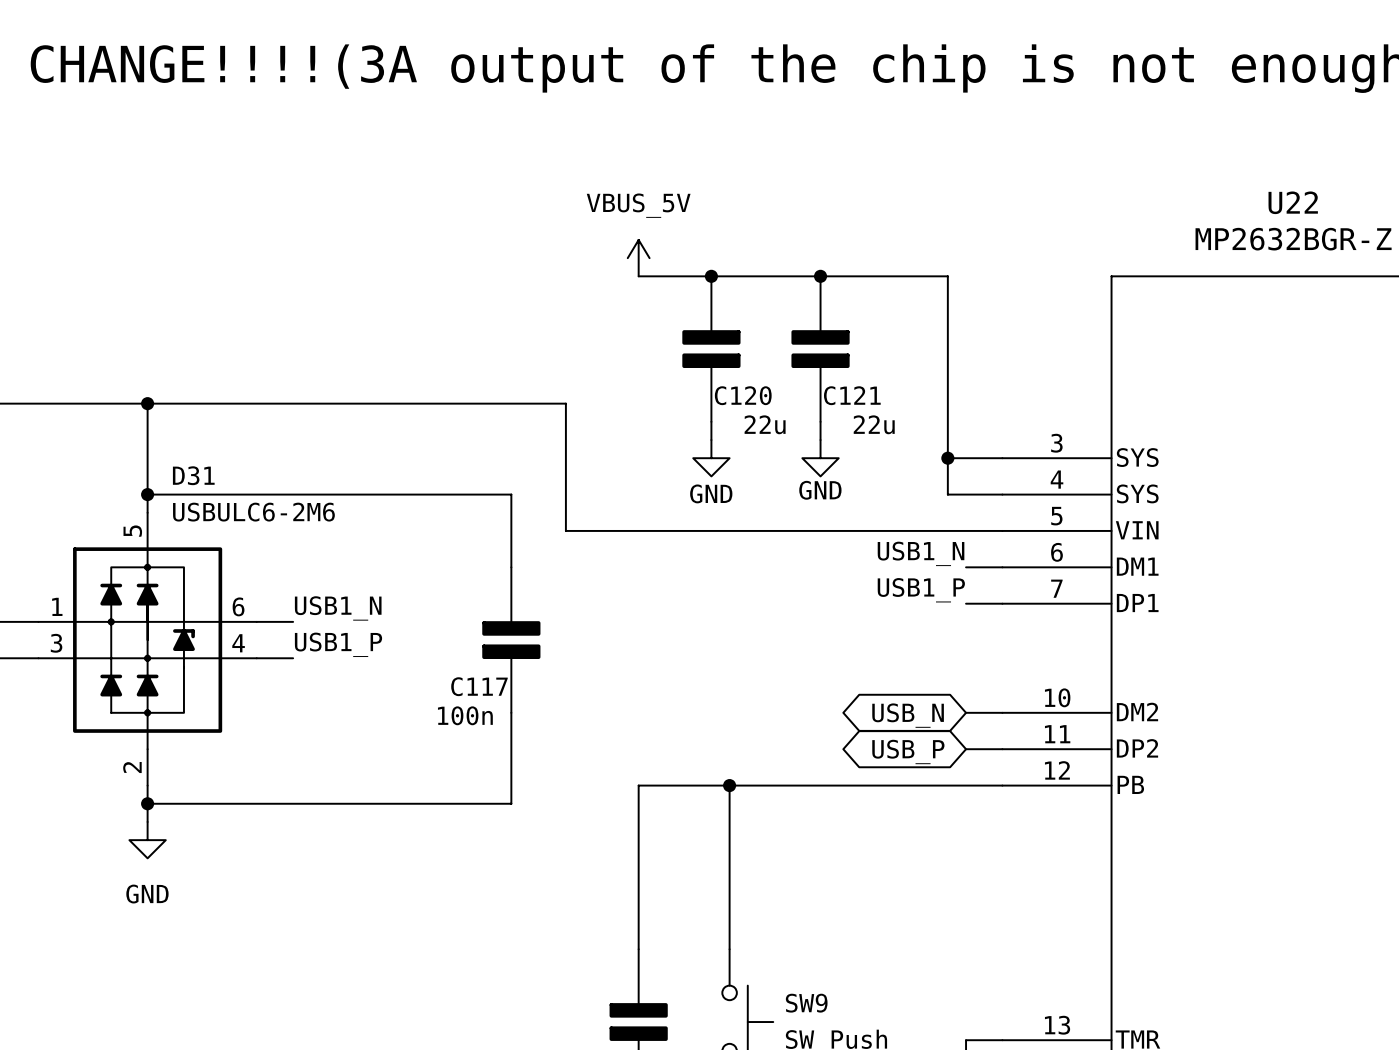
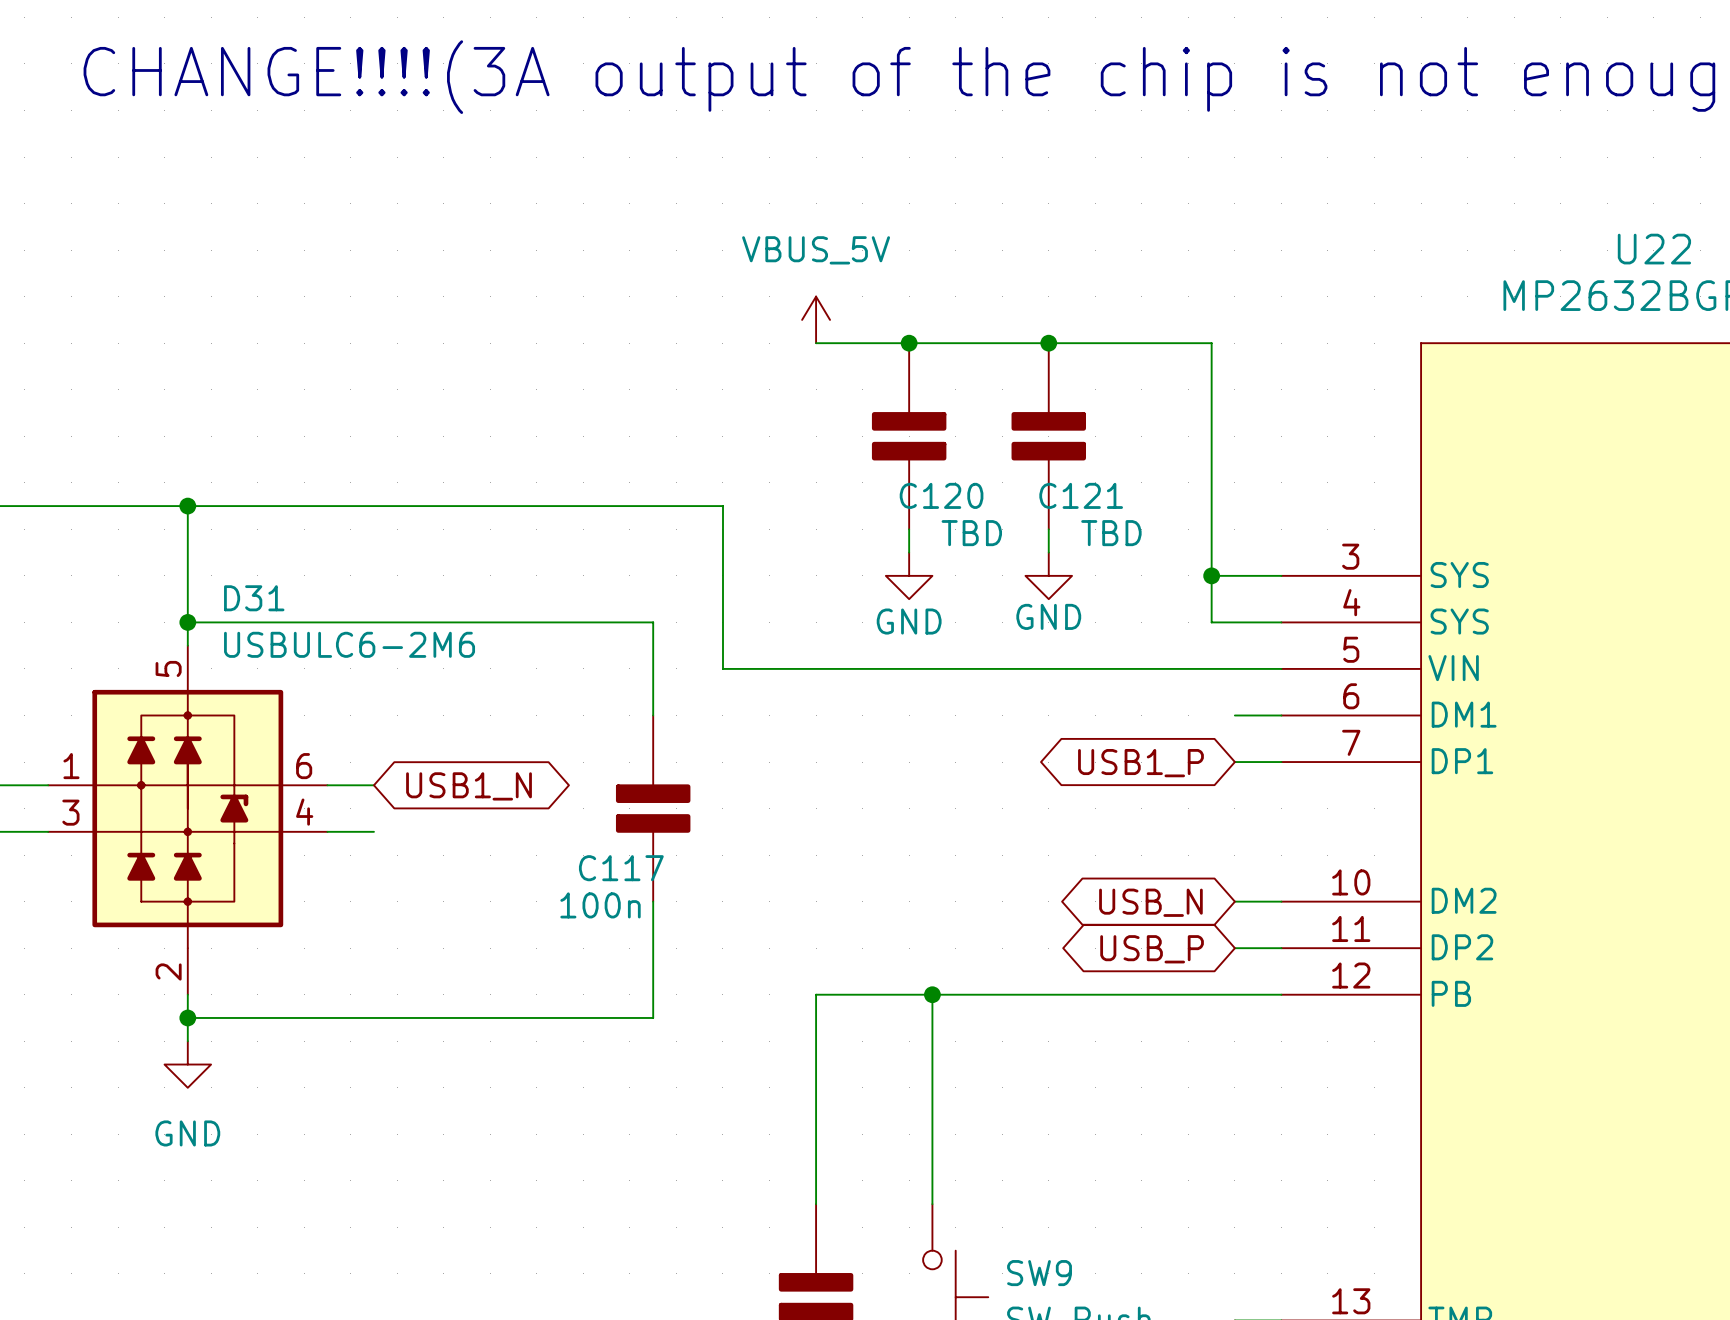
C120 value: 22u (765, 424) -> TBD (971, 533)
C121 value: 22u (874, 424) -> TBD (1111, 533)
label: USB1_N (921, 553) -> none
label: USB1_P (921, 590) -> none
global label: none -> USB1_P (1140, 763)
label: USB1_N (338, 608) -> none
global label: none -> USB1_N (469, 786)
label: USB1_P (338, 644) -> none

